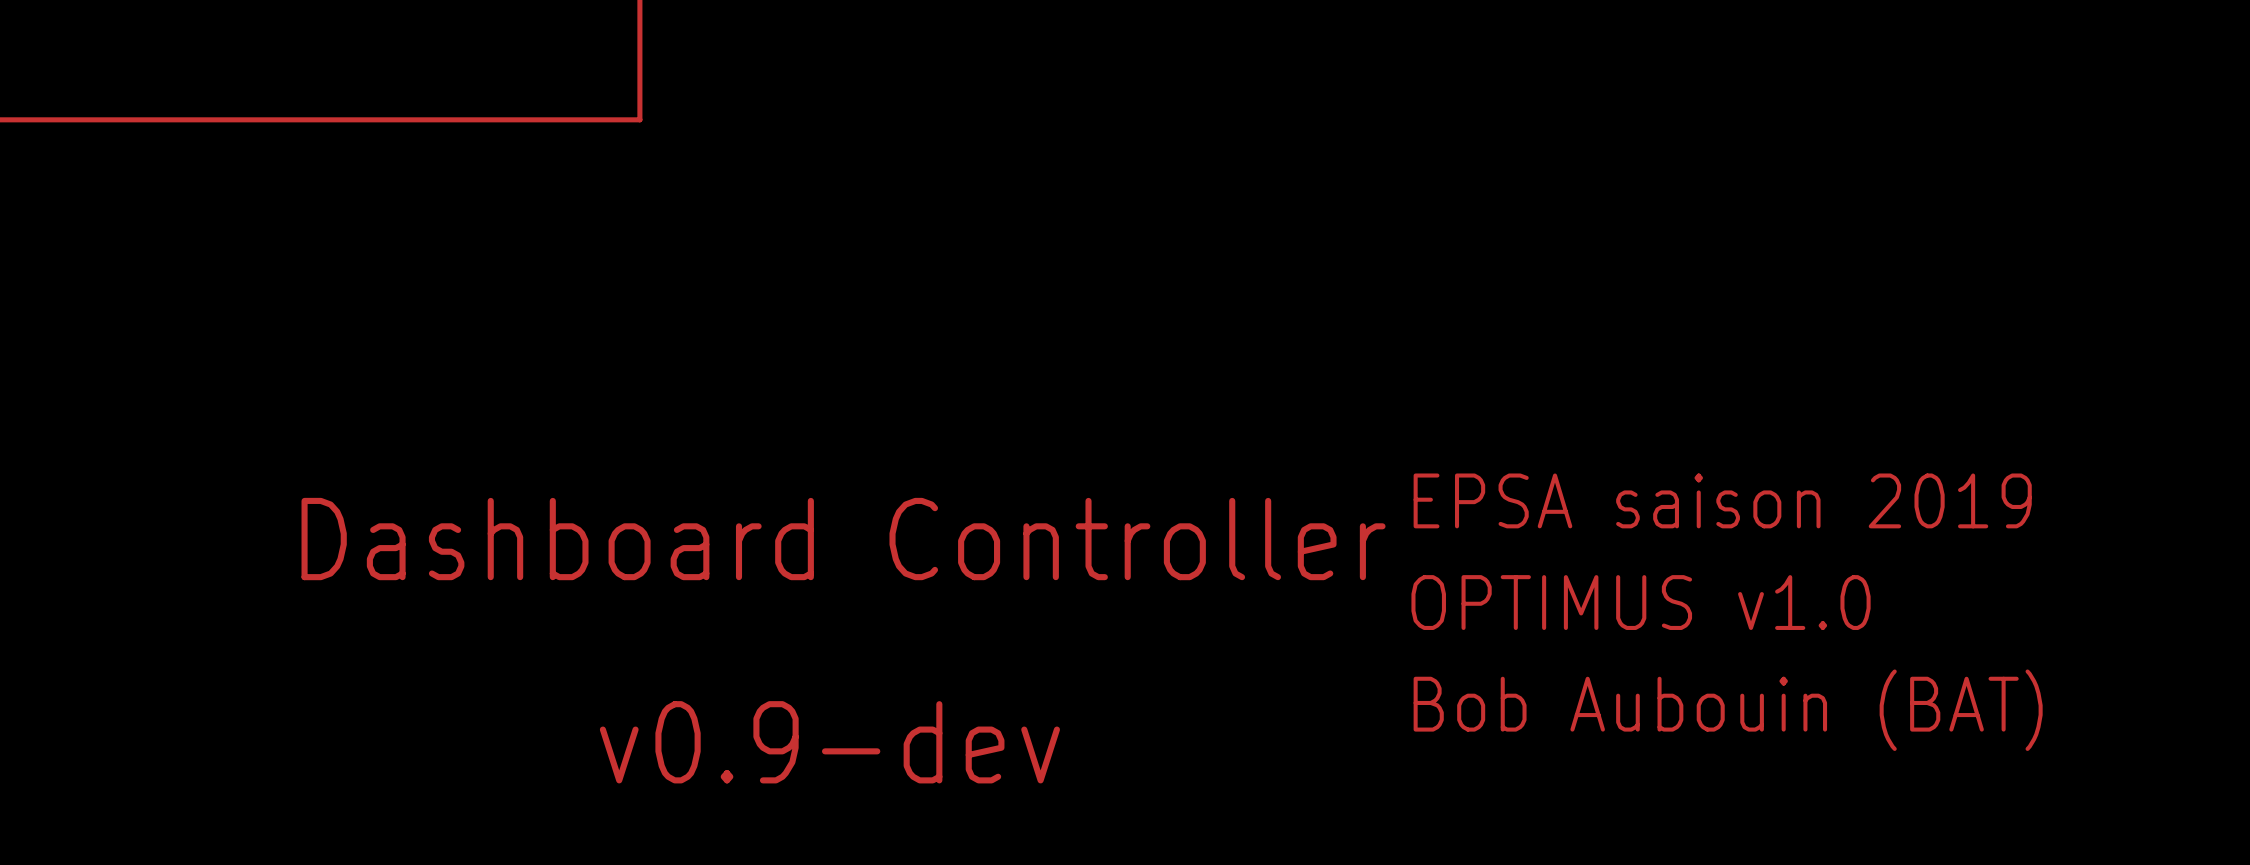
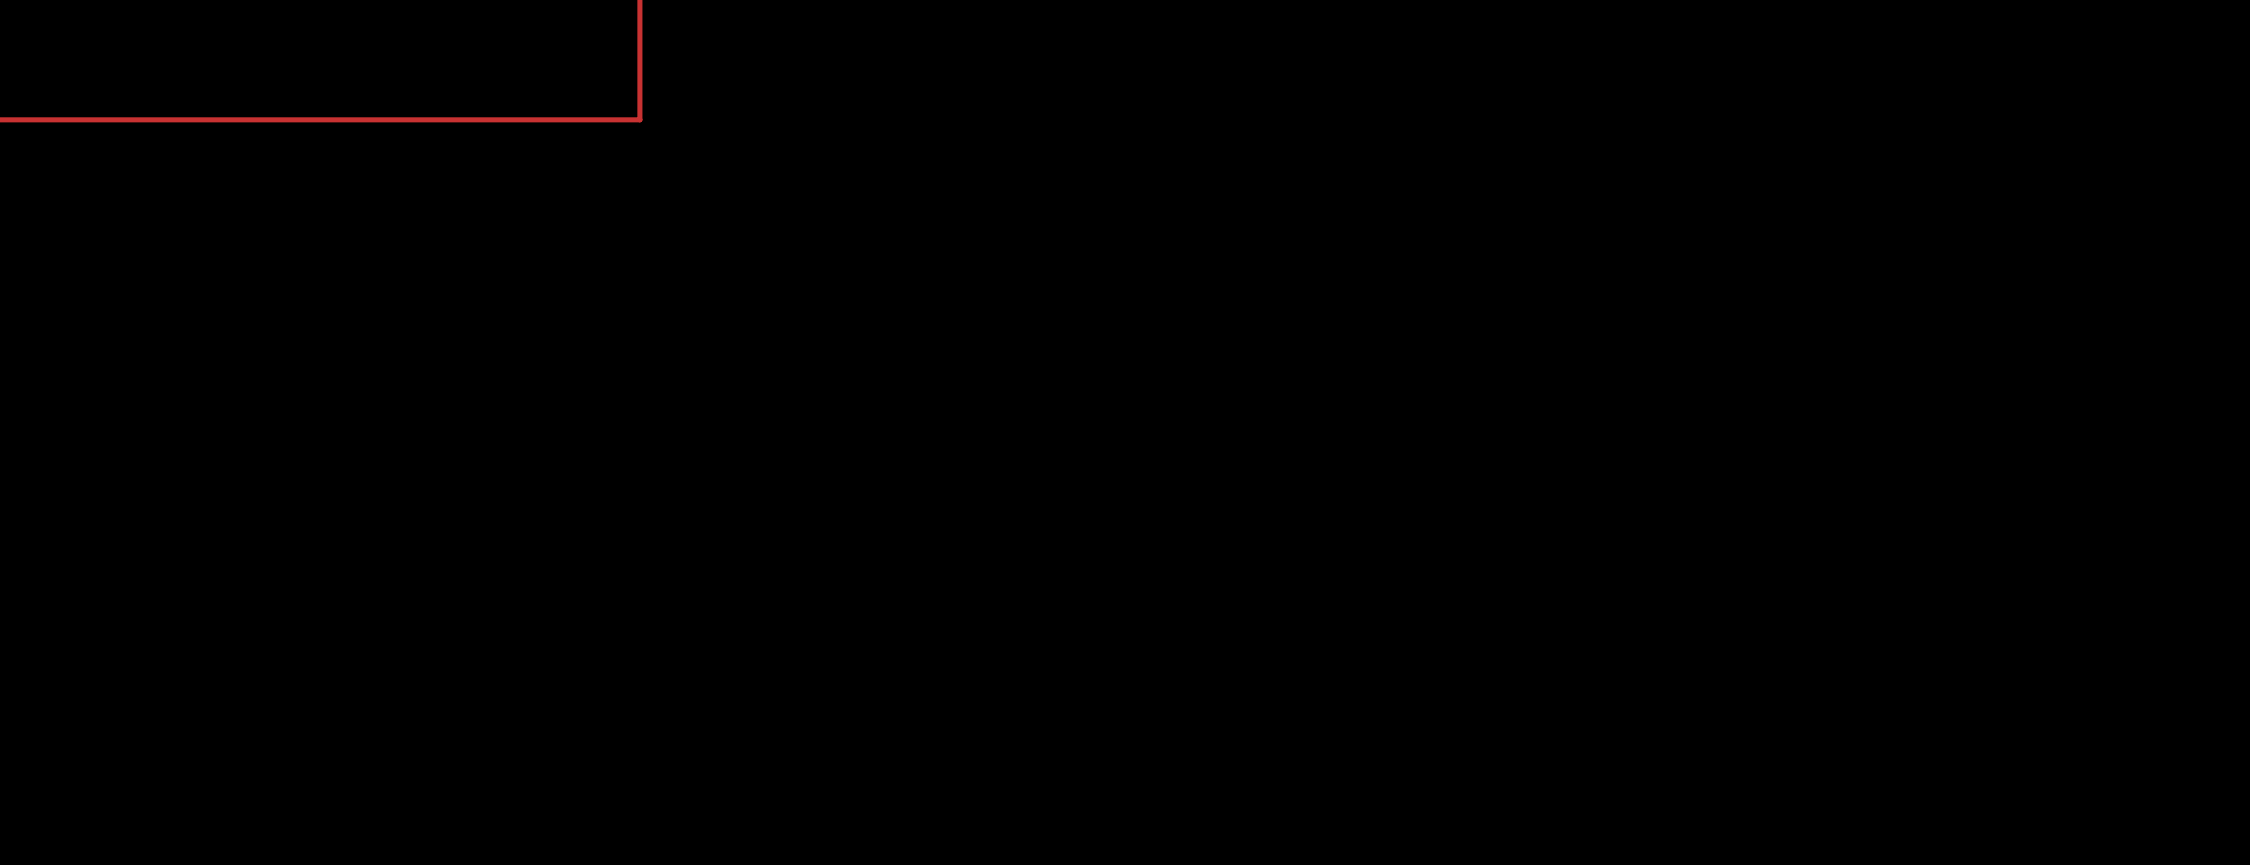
text: EPSA saison 2019 (1722, 500) -> none
text: Dashboard Controller (843, 539) -> none
text: OPTIMUS v1.0 (1641, 602) -> none
text: Bob Aubouin (BAT) (1728, 710) -> none
text: v0.9-dev (829, 742) -> none

